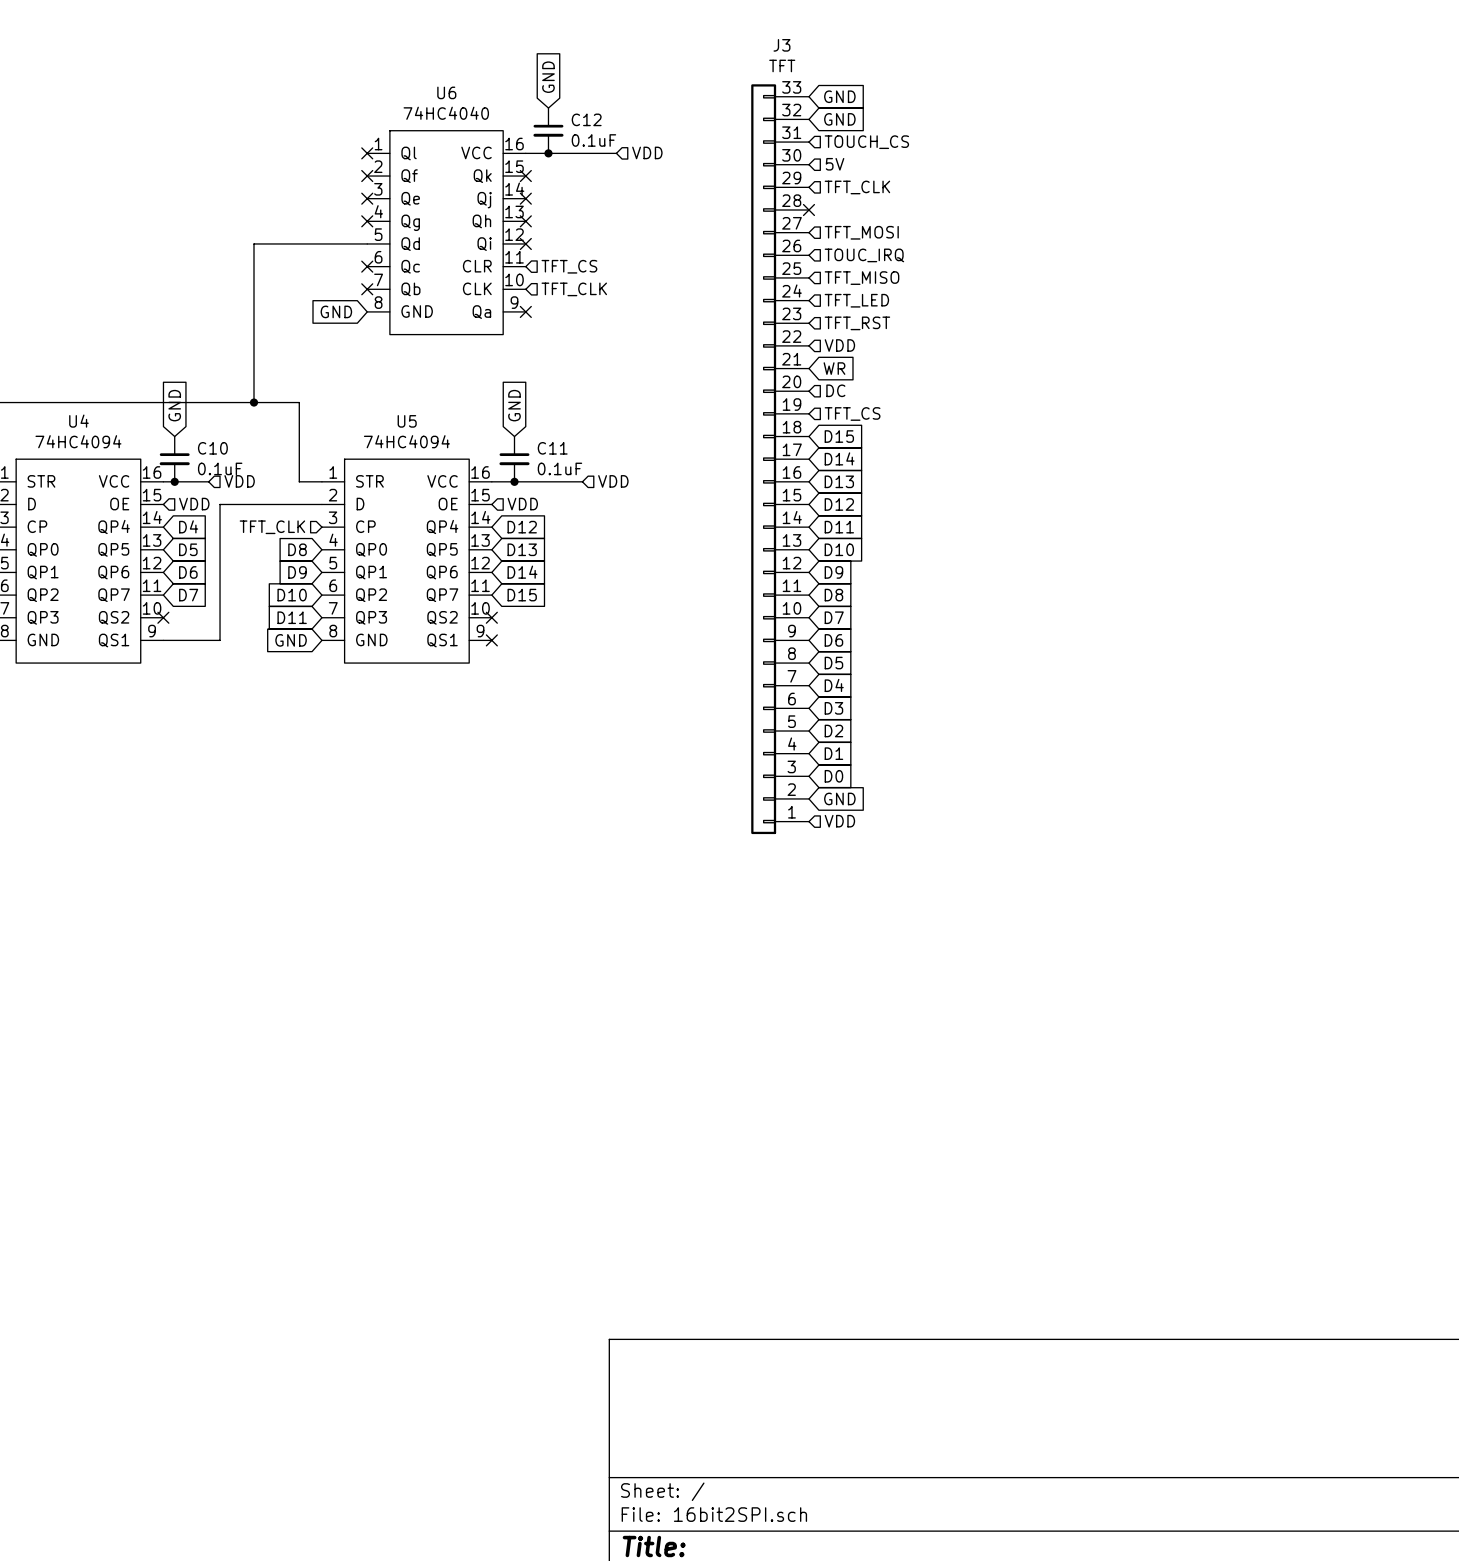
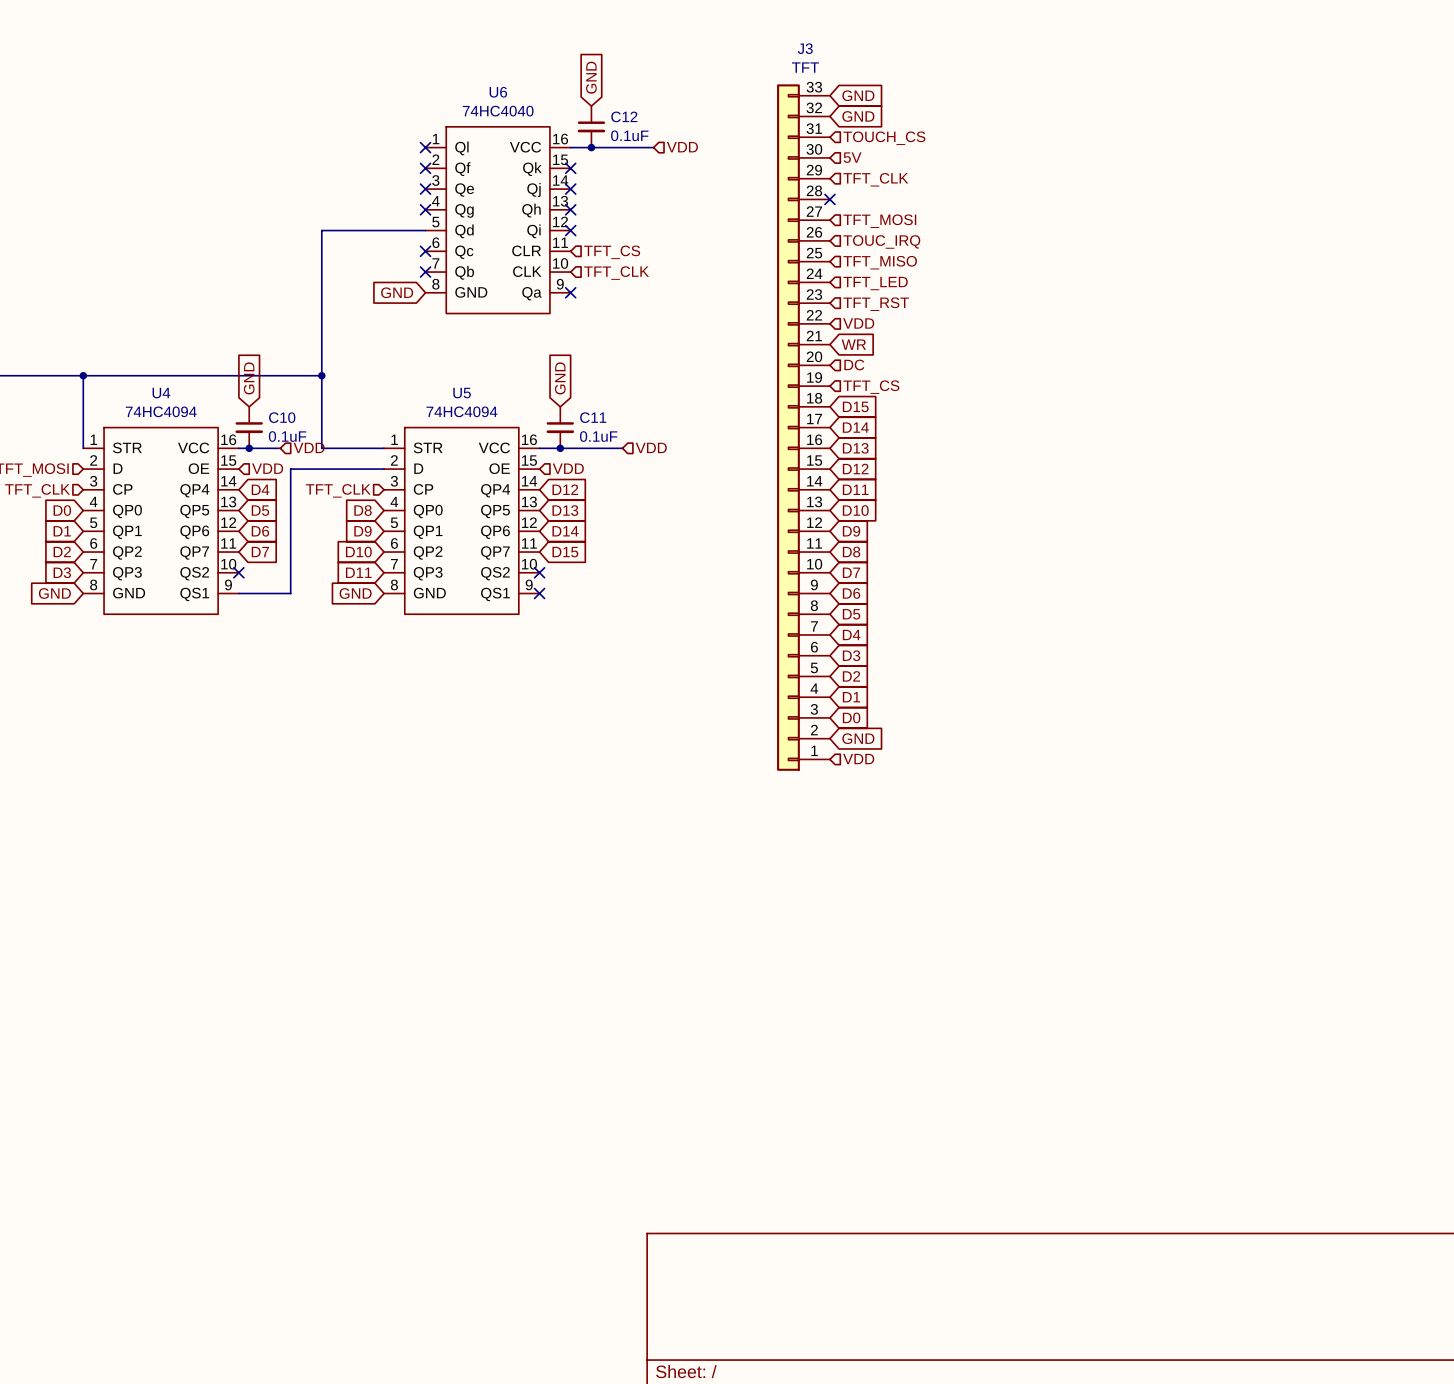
wire: (253, 402) (299, 402) (299, 481) -> (321, 375) (321, 448) (363, 448)

